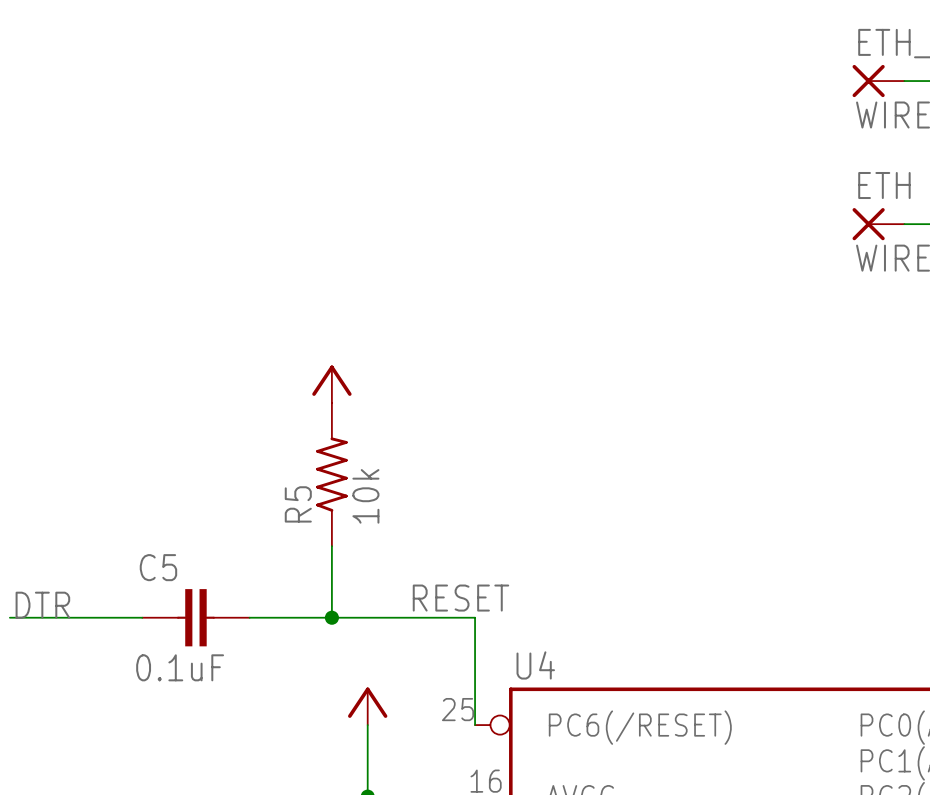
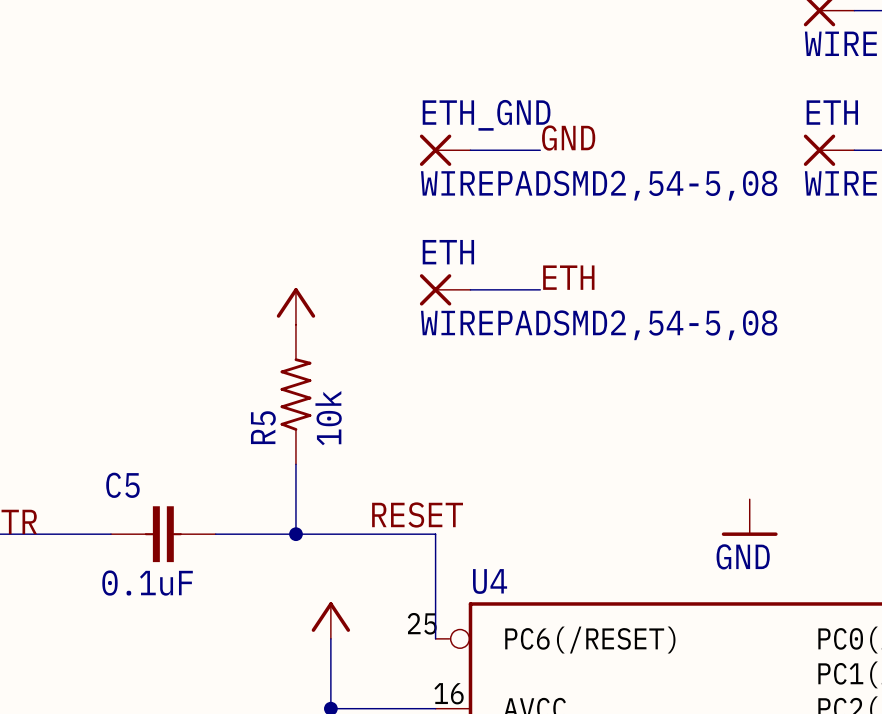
label: none -> GND (568, 138)
ETH_GND: none -> WIREPADSMD2,54-5,08 (445, 150)
wire: none -> (470, 150) (540, 150)
label: none -> ETH (568, 277)
ETH: none -> WIREPADSMD2,54-5,08 (445, 289)
wire: none -> (470, 289) (540, 289)
power symbol: none -> GND (749, 517)

